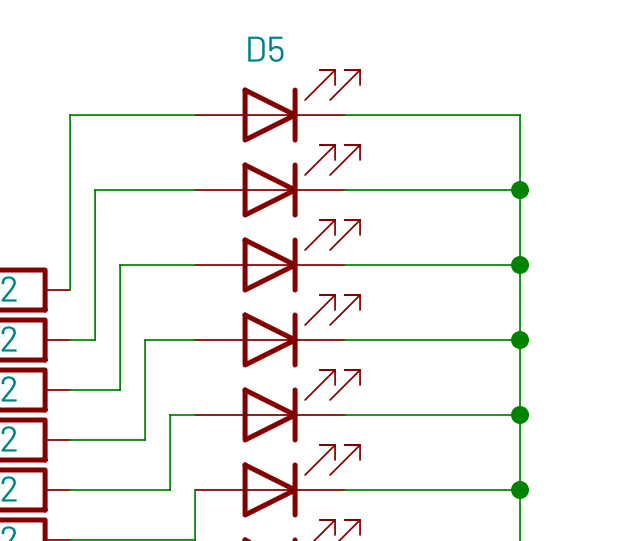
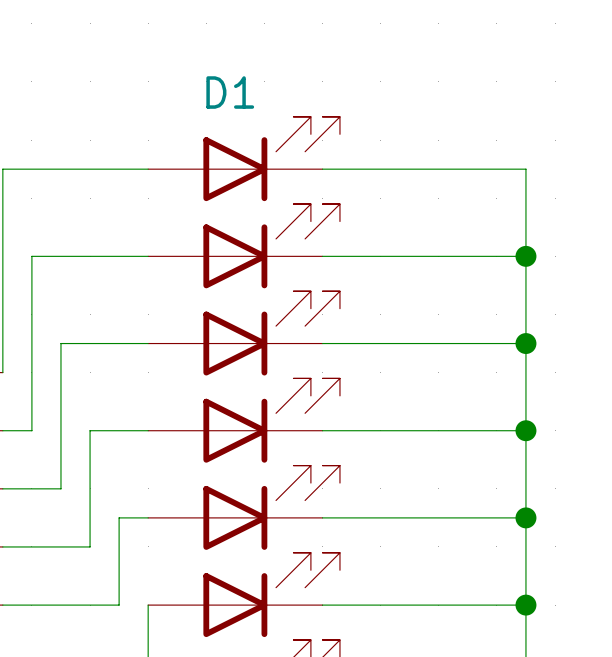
D5 name: D5 (265, 49) -> D1 (230, 92)

